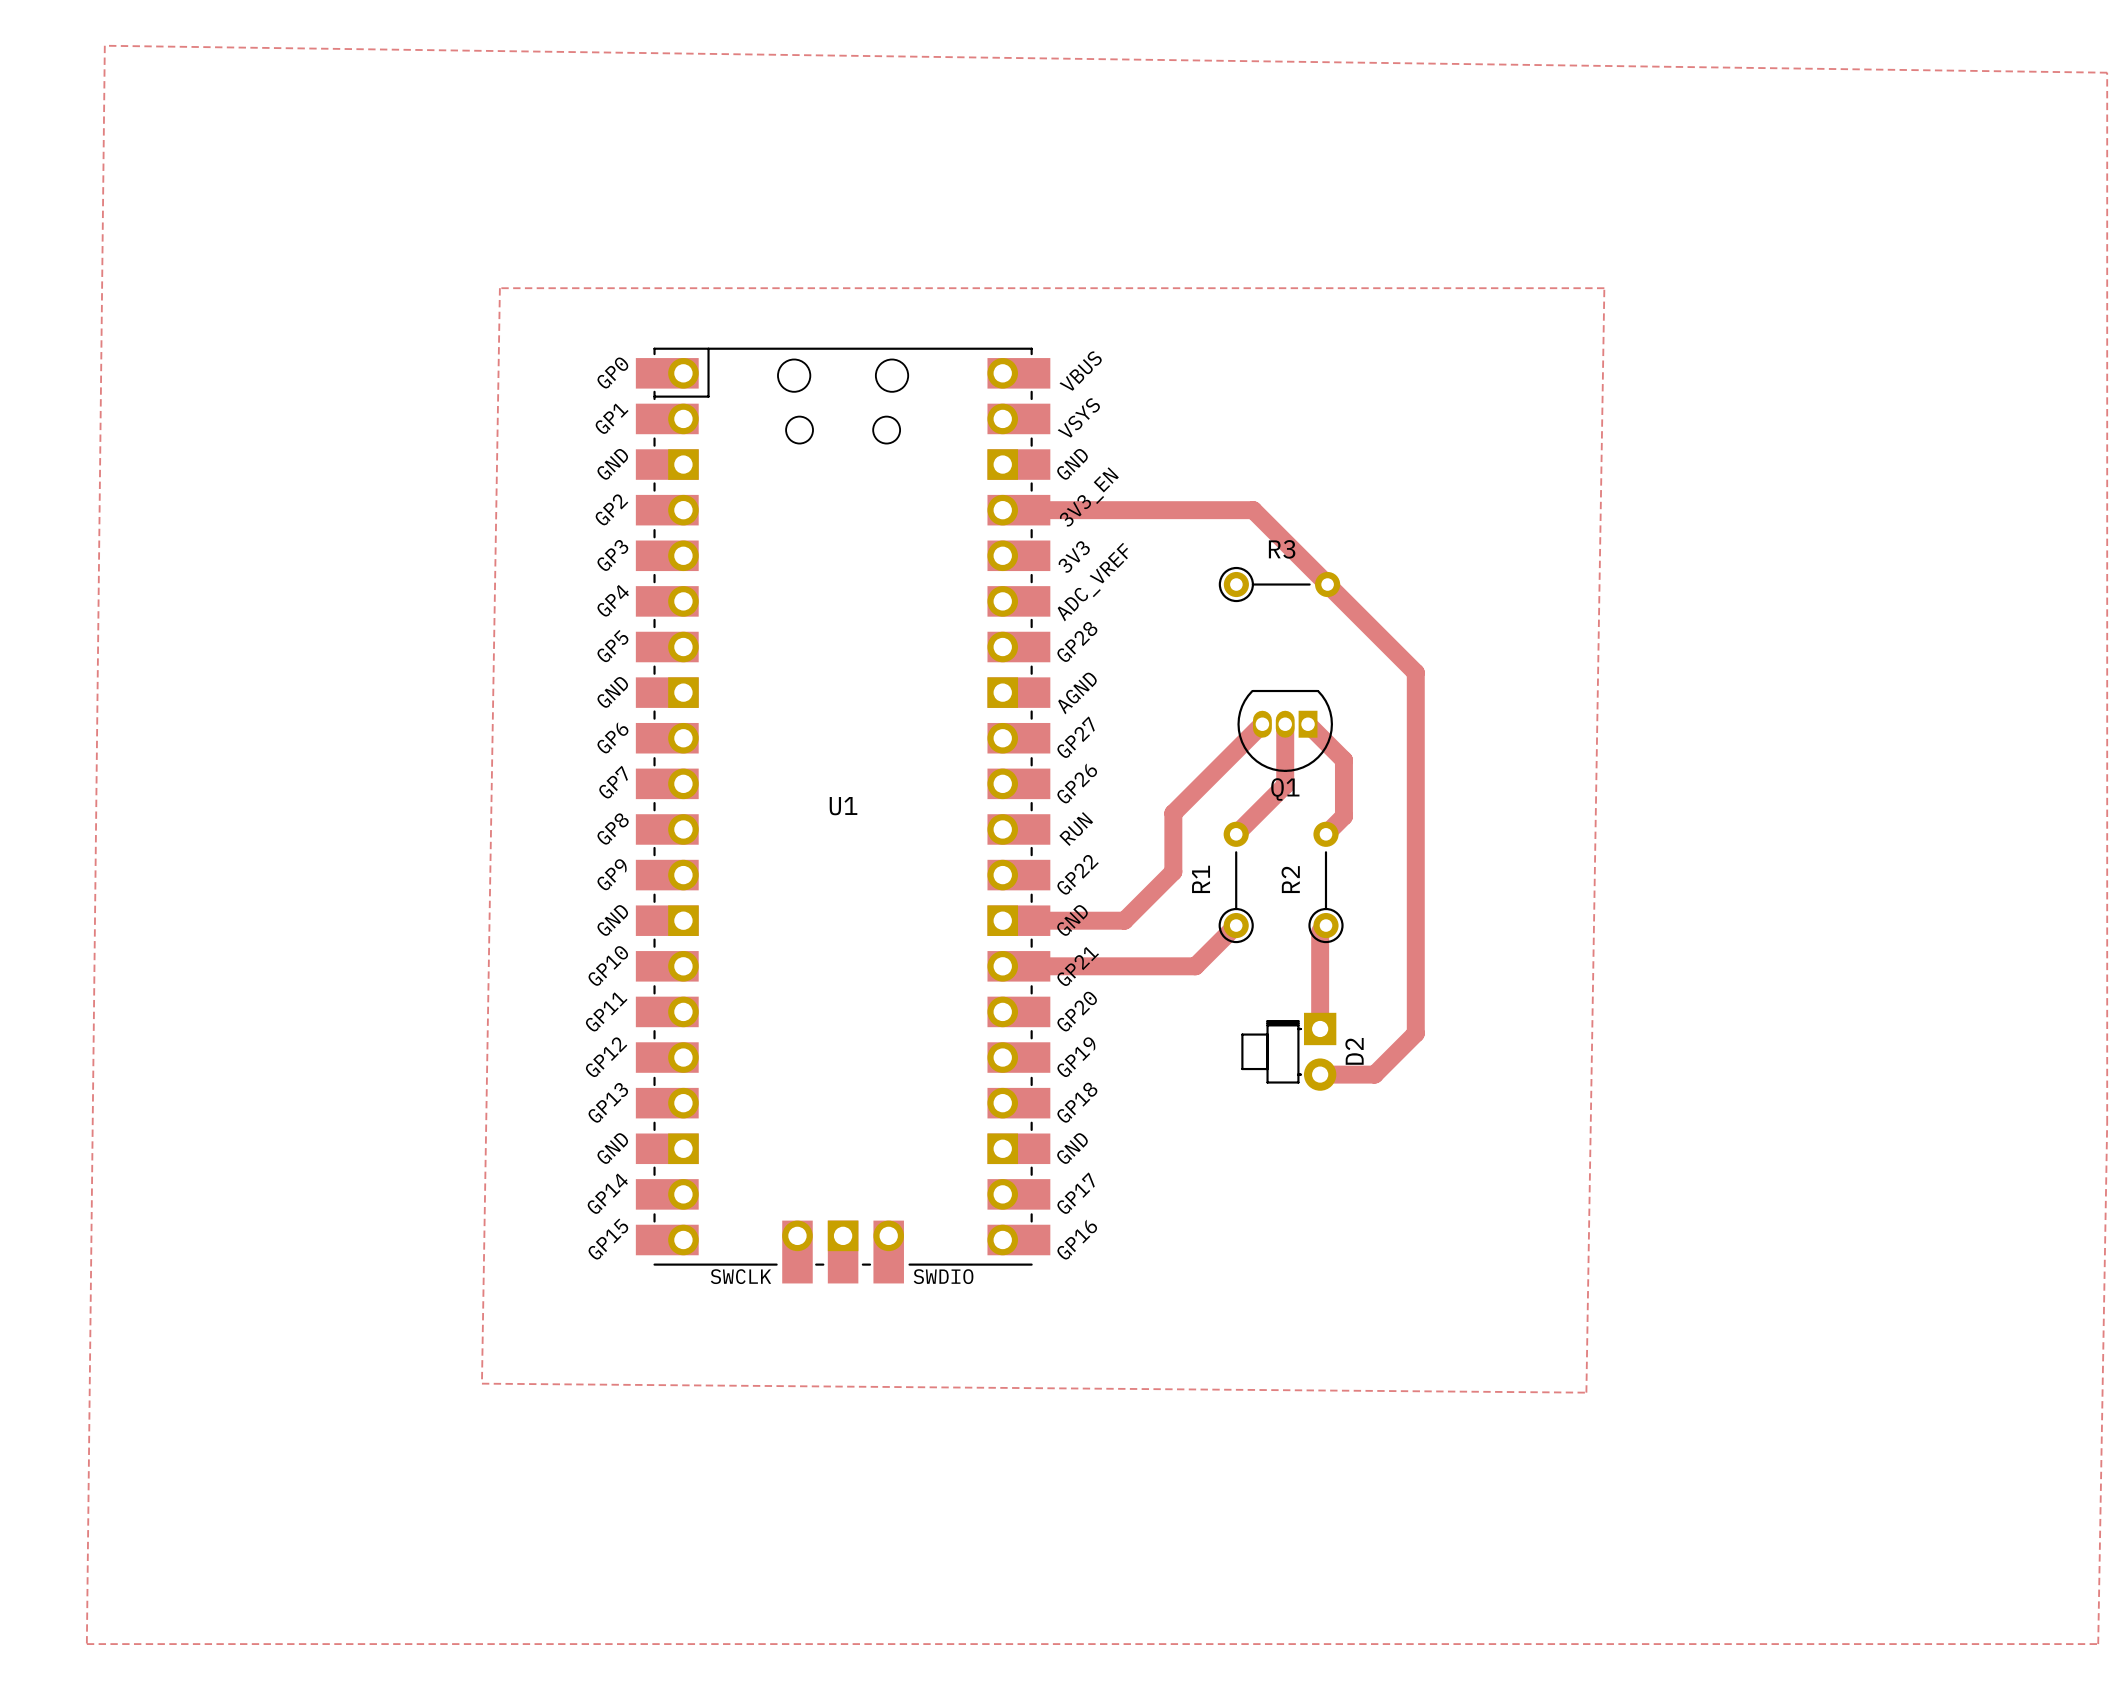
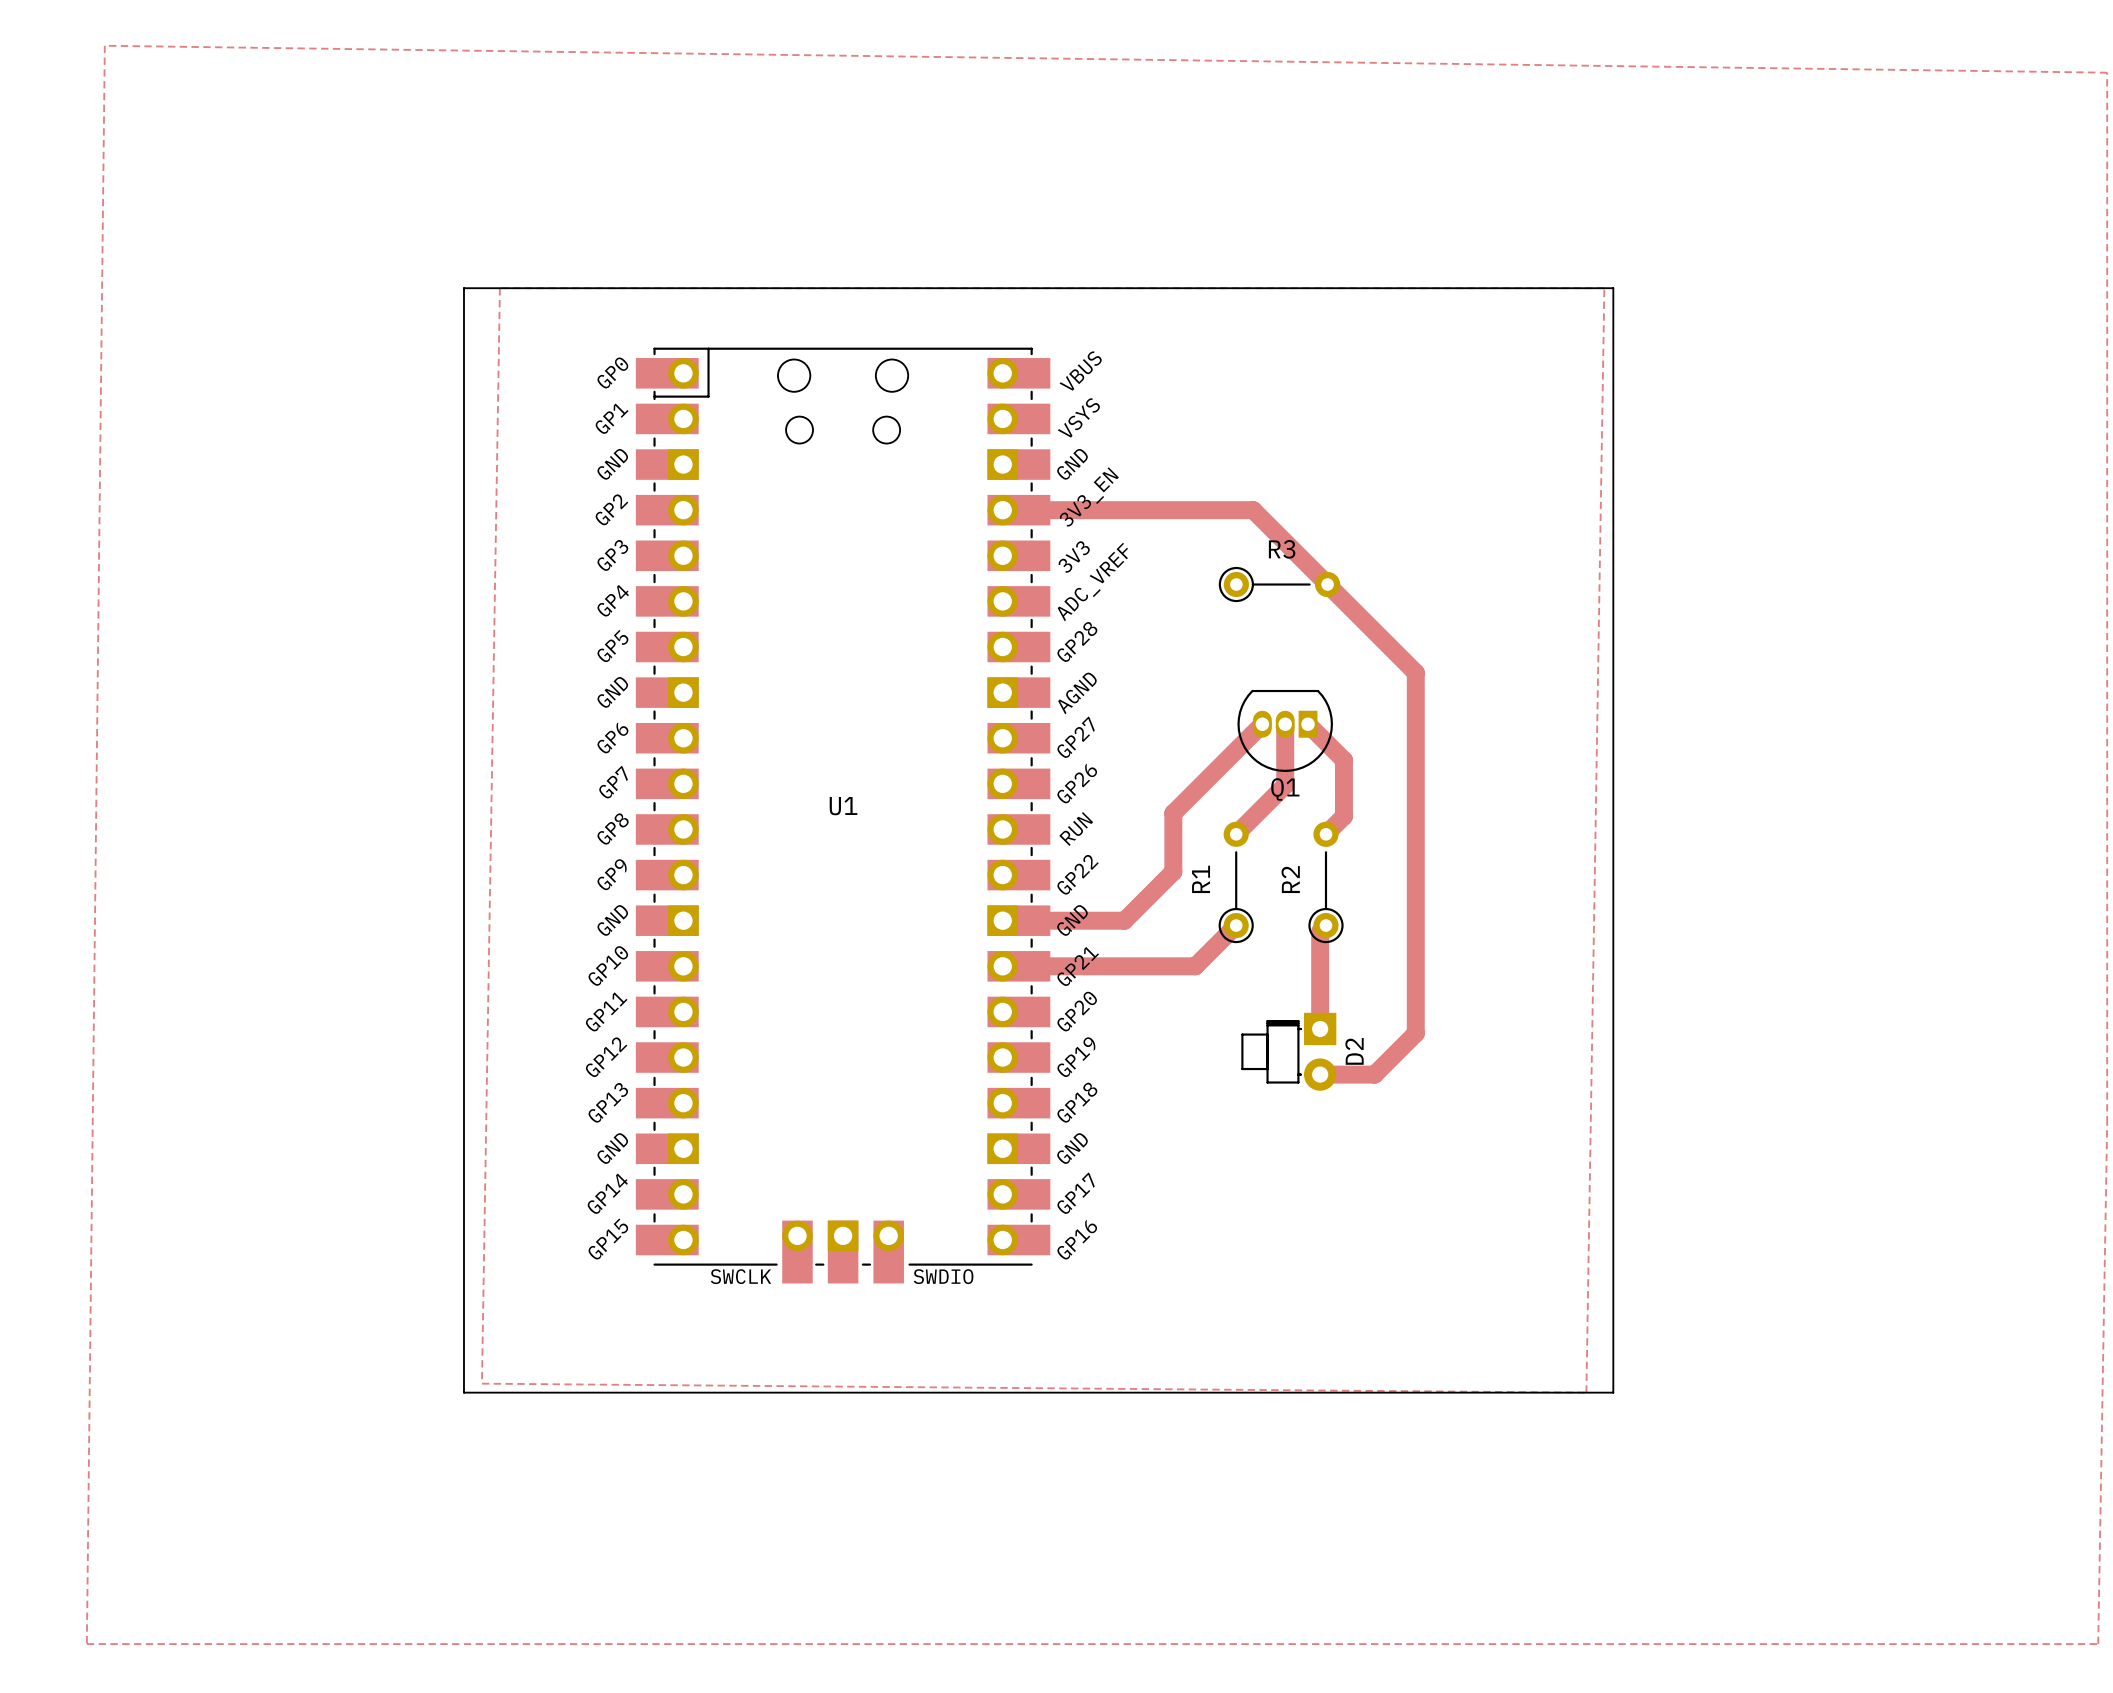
board edge: none -> (463, 288) (1613, 288) (1613, 1392) (463, 1392) (463, 288)

